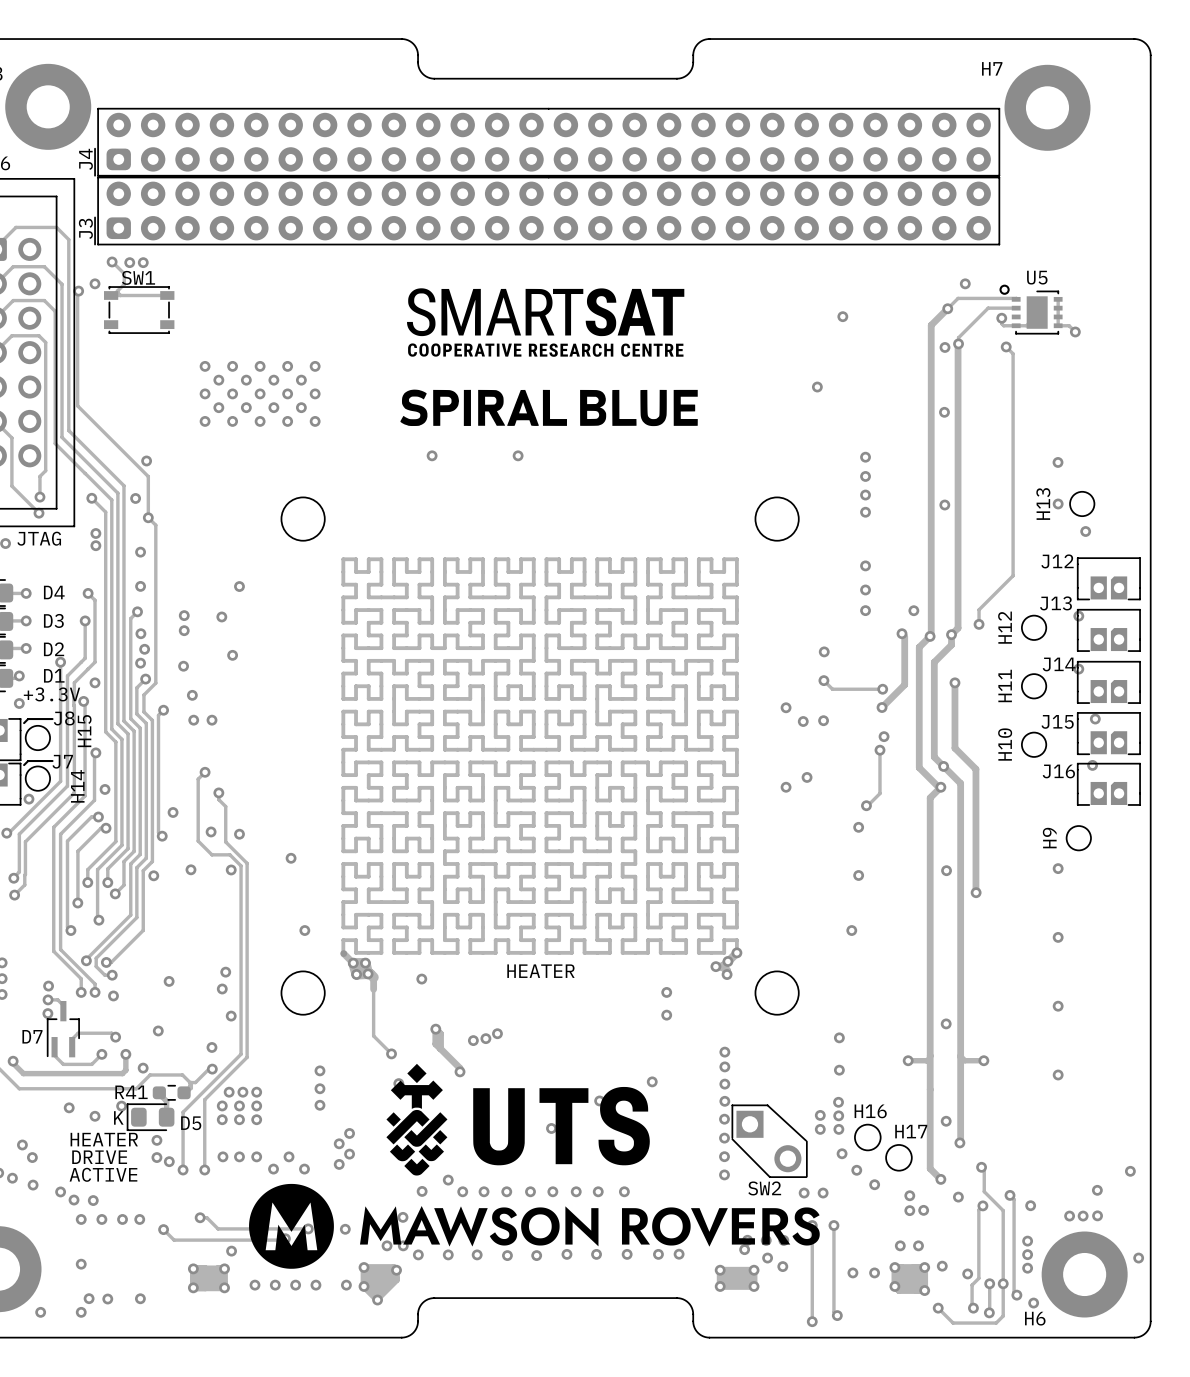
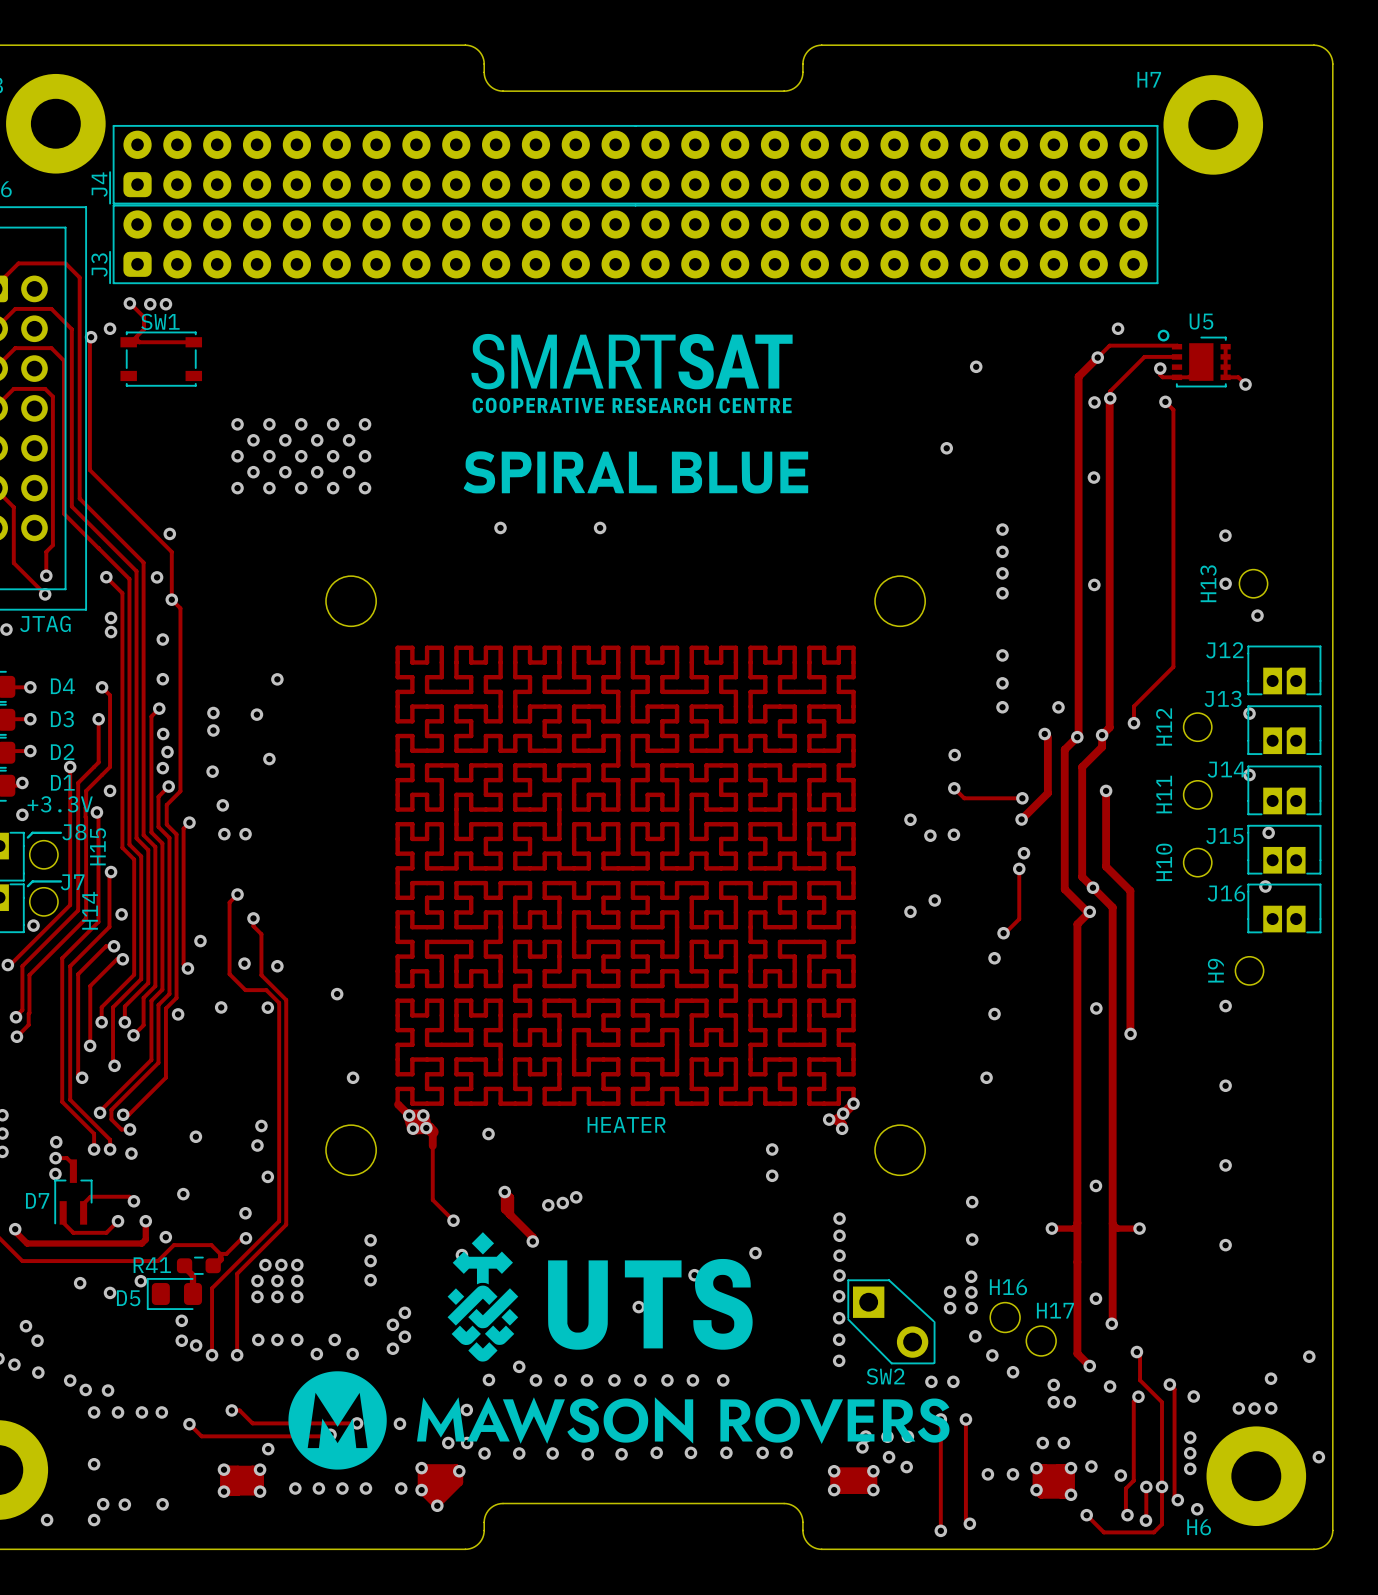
text: K (118, 1117) -> none
D5 name position: D5 (191, 1123) -> D5 (128, 1298)
text: HEATER (104, 1139) -> none
text: DRIVE (99, 1157) -> none
text: ACTIVE (103, 1174) -> none

